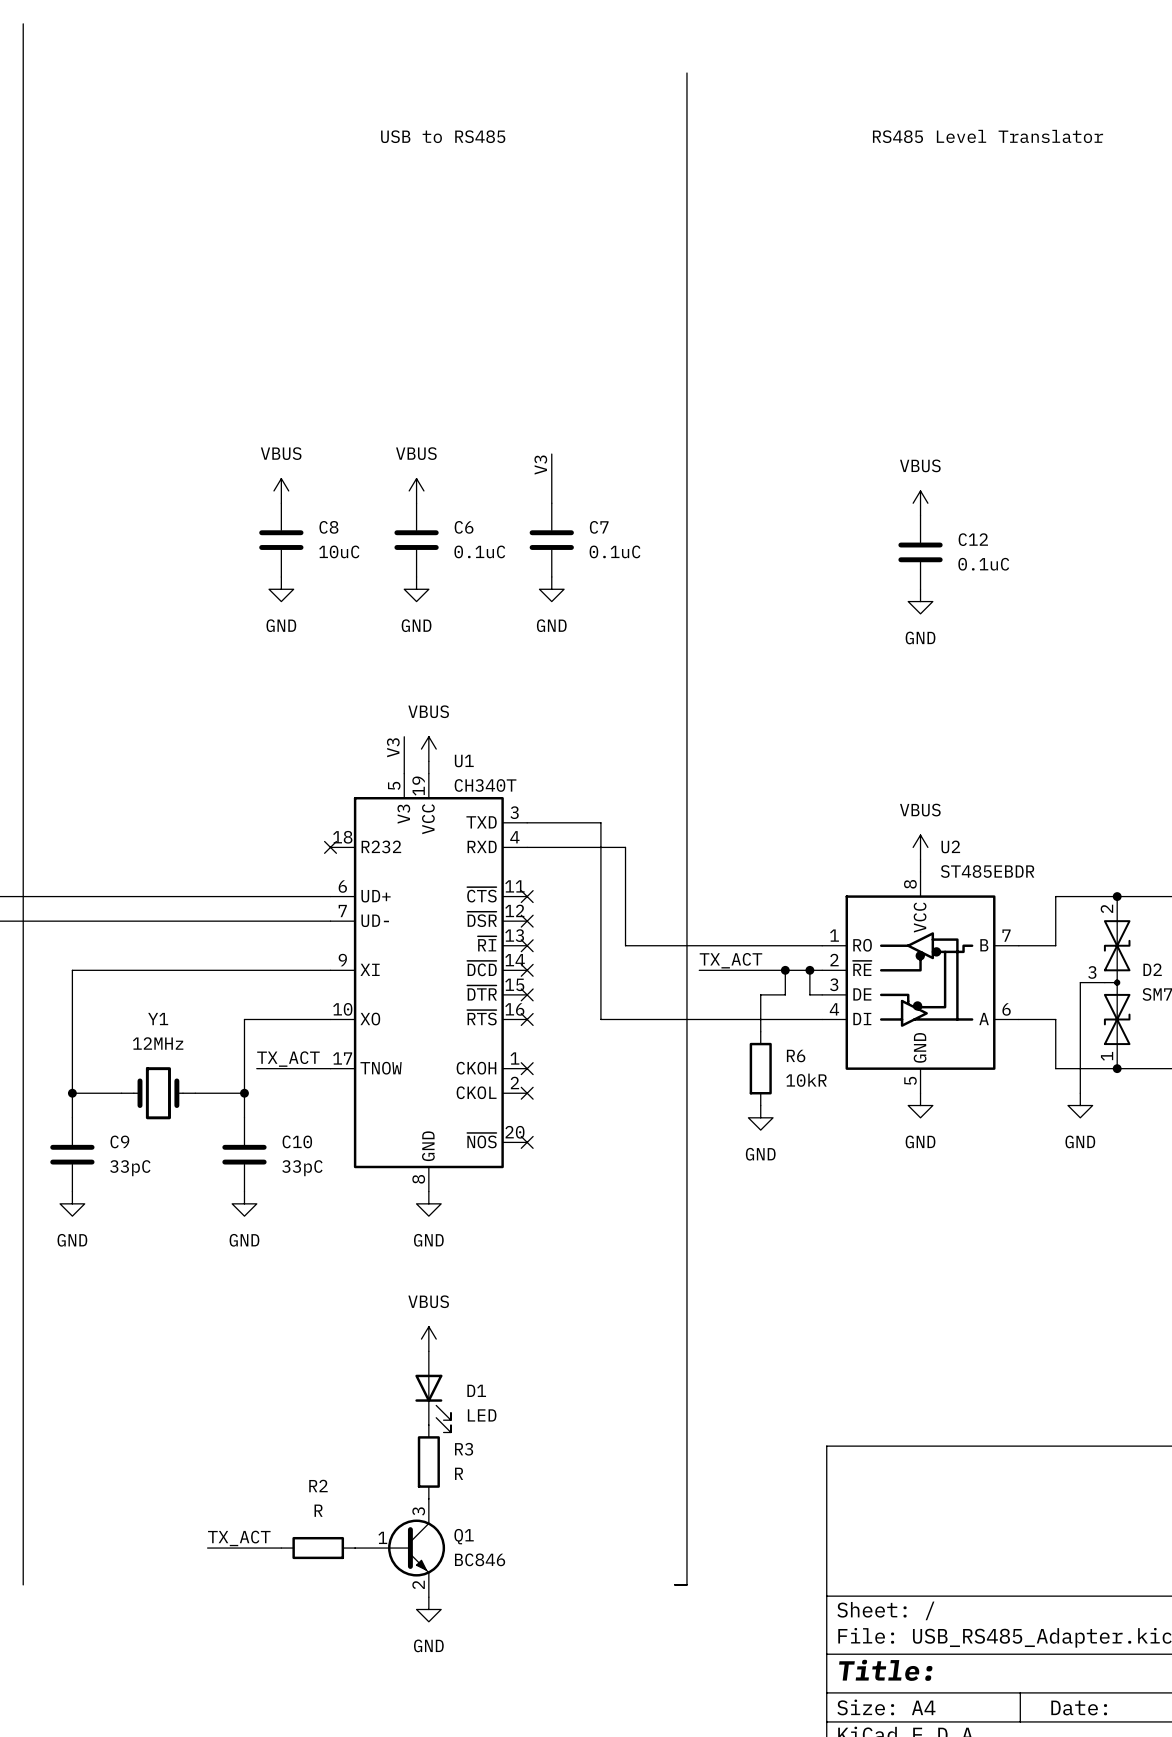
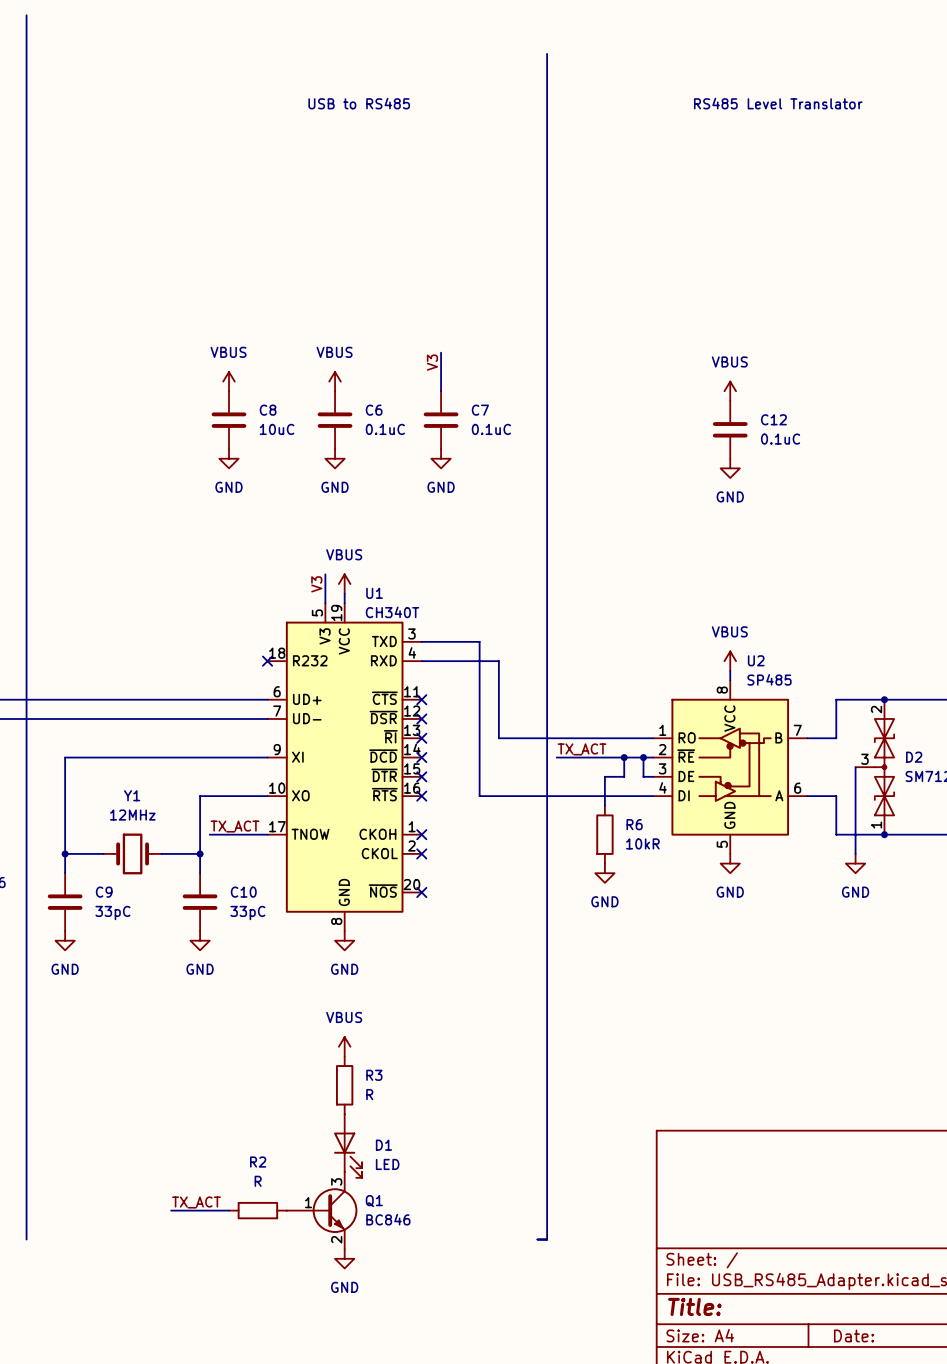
U2 value: ST485EBDR (987, 871) -> SP485 (769, 679)
D1 position: (433, 1391) -> (348, 1146)
R3 position: (428, 1461) -> (344, 1085)

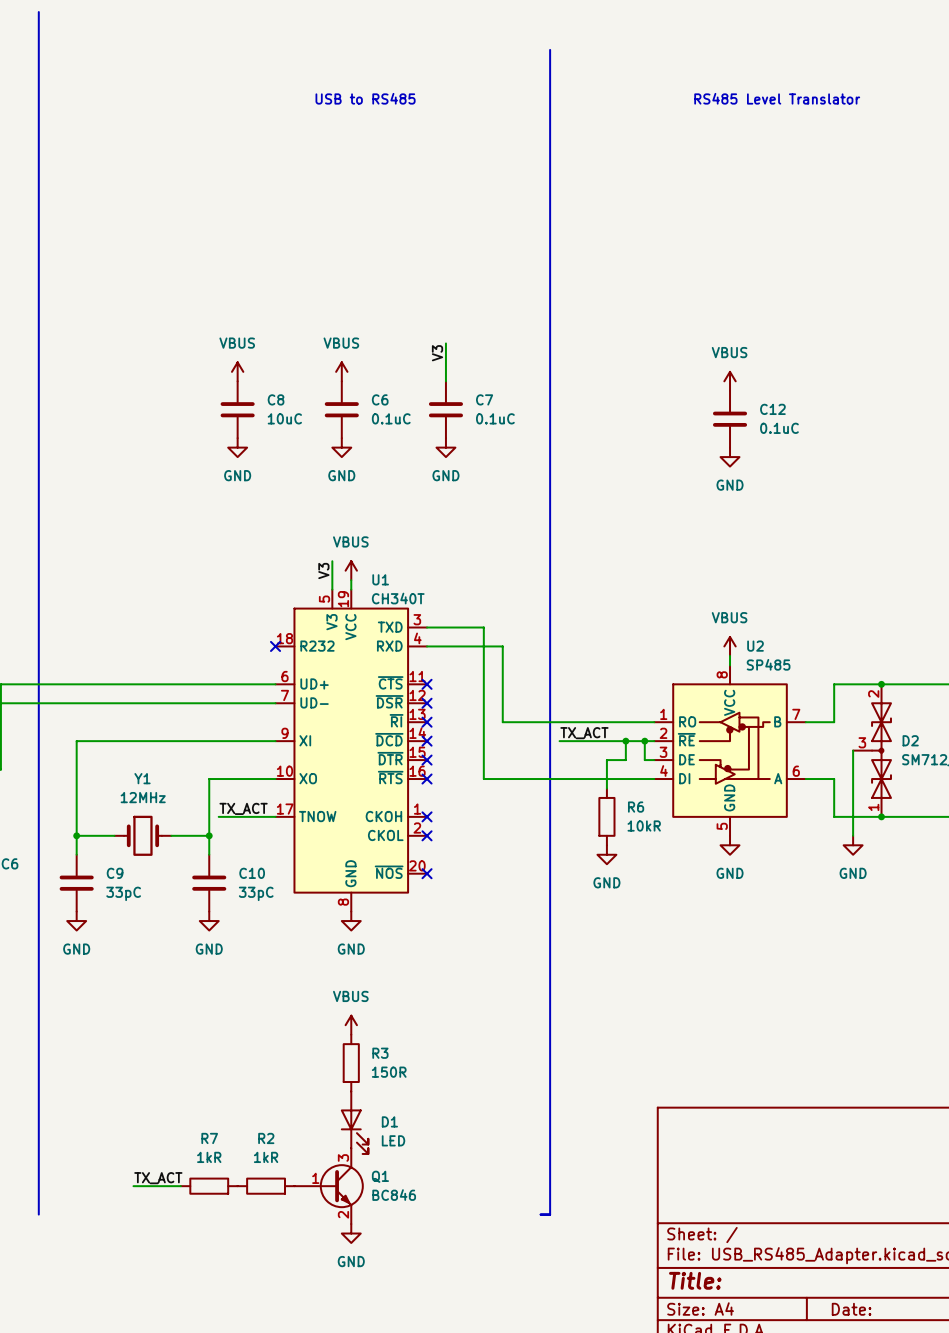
R3 value: R (369, 1094) -> 150R (389, 1072)
R2 value: R (258, 1181) -> 1kR (266, 1157)
label position: TX_ACT (196, 1202) -> TX_ACT (158, 1178)
wire: (171, 1210) (228, 1210) -> (180, 1186) (133, 1186)
R7: none -> 1kR (209, 1186)

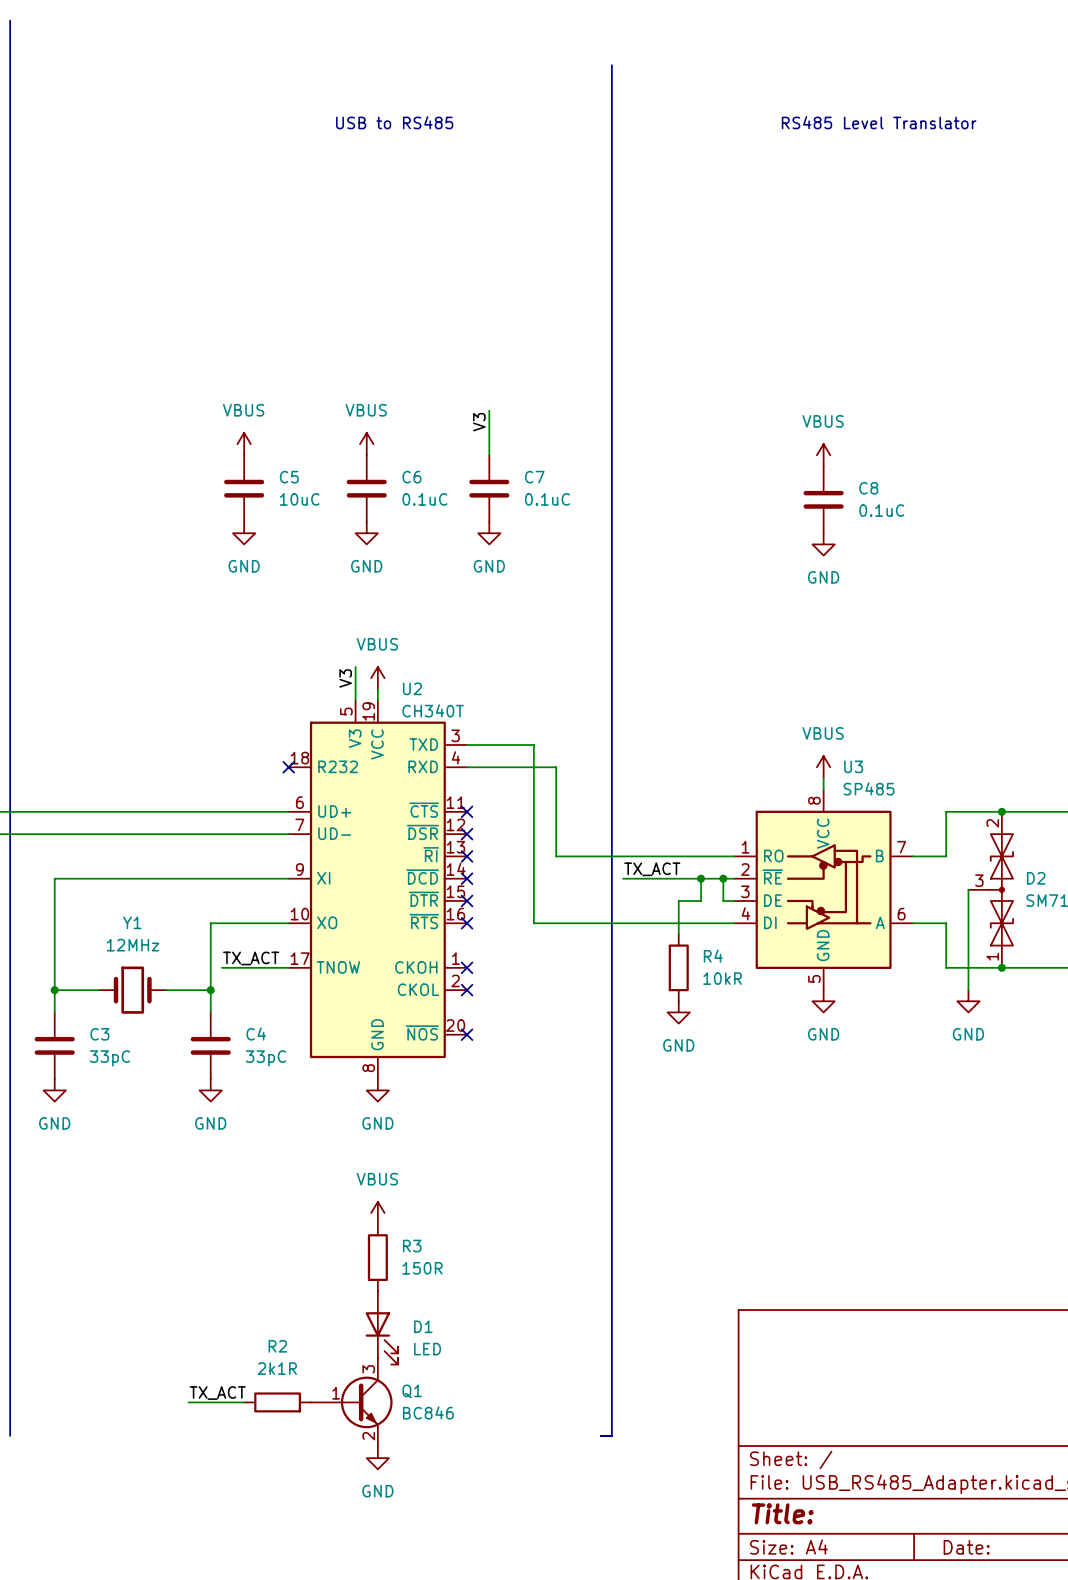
C8 name: C8 (276, 399) -> C5 (289, 477)
C12 name: C12 (772, 409) -> C8 (868, 488)
U1 name: U1 (380, 579) -> U2 (412, 688)
U2 name: U2 (755, 646) -> U3 (853, 766)
R6 name: R6 (636, 807) -> R4 (713, 956)
C9 name: C9 (115, 873) -> C3 (99, 1034)
C10 name: C10 (252, 873) -> C4 (256, 1034)
R2 value: 1kR (266, 1157) -> 2k1R (277, 1368)
label position: TX_ACT (158, 1178) -> TX_ACT (217, 1393)
wire: (133, 1186) (180, 1186) -> (188, 1402) (244, 1402)
R7: 1kR (209, 1186) -> none

